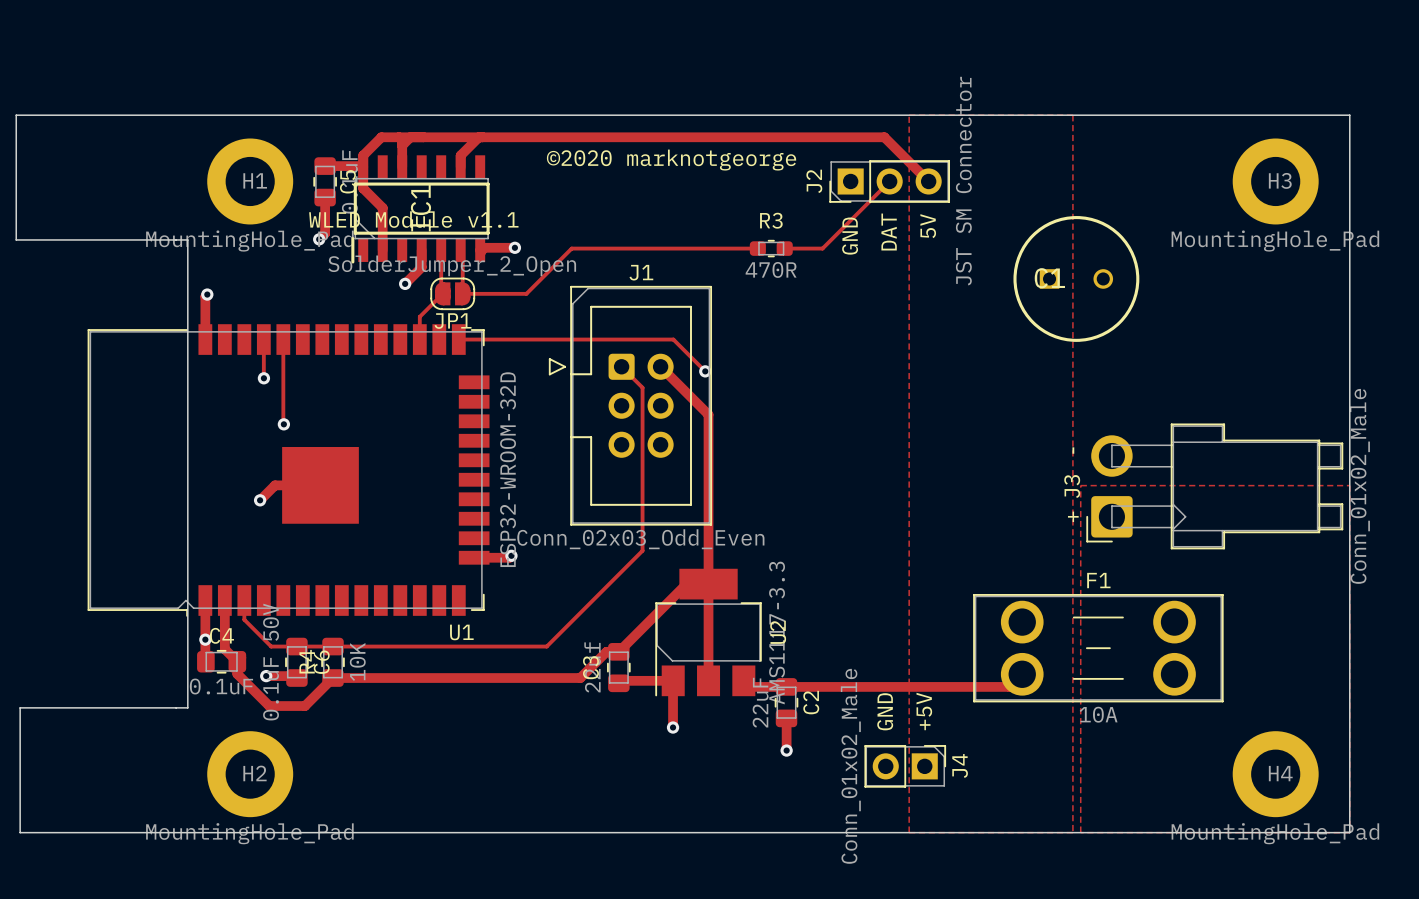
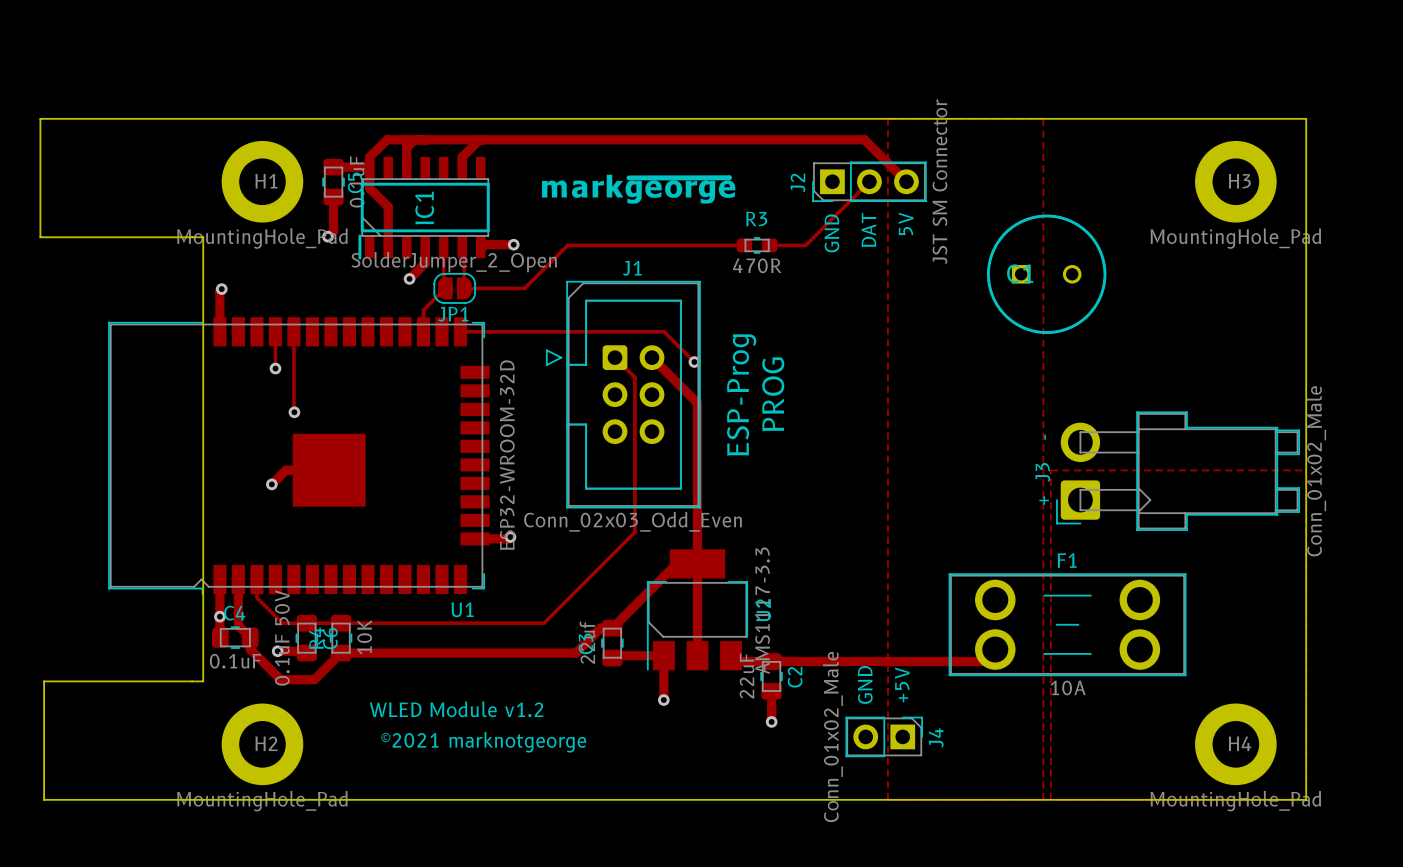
text: ©2020 marknotgeorge (671, 160) -> none
drawing: none -> [541, 174, 736, 204]
text: WLED Module v1.1 (413, 219) -> none
text: none -> ESP-Prog (741, 395)
text: none -> PROG (773, 394)
text: none -> WLED Module v1.2 (456, 709)
text: none -> ©2021 marknotgeorge (483, 742)

